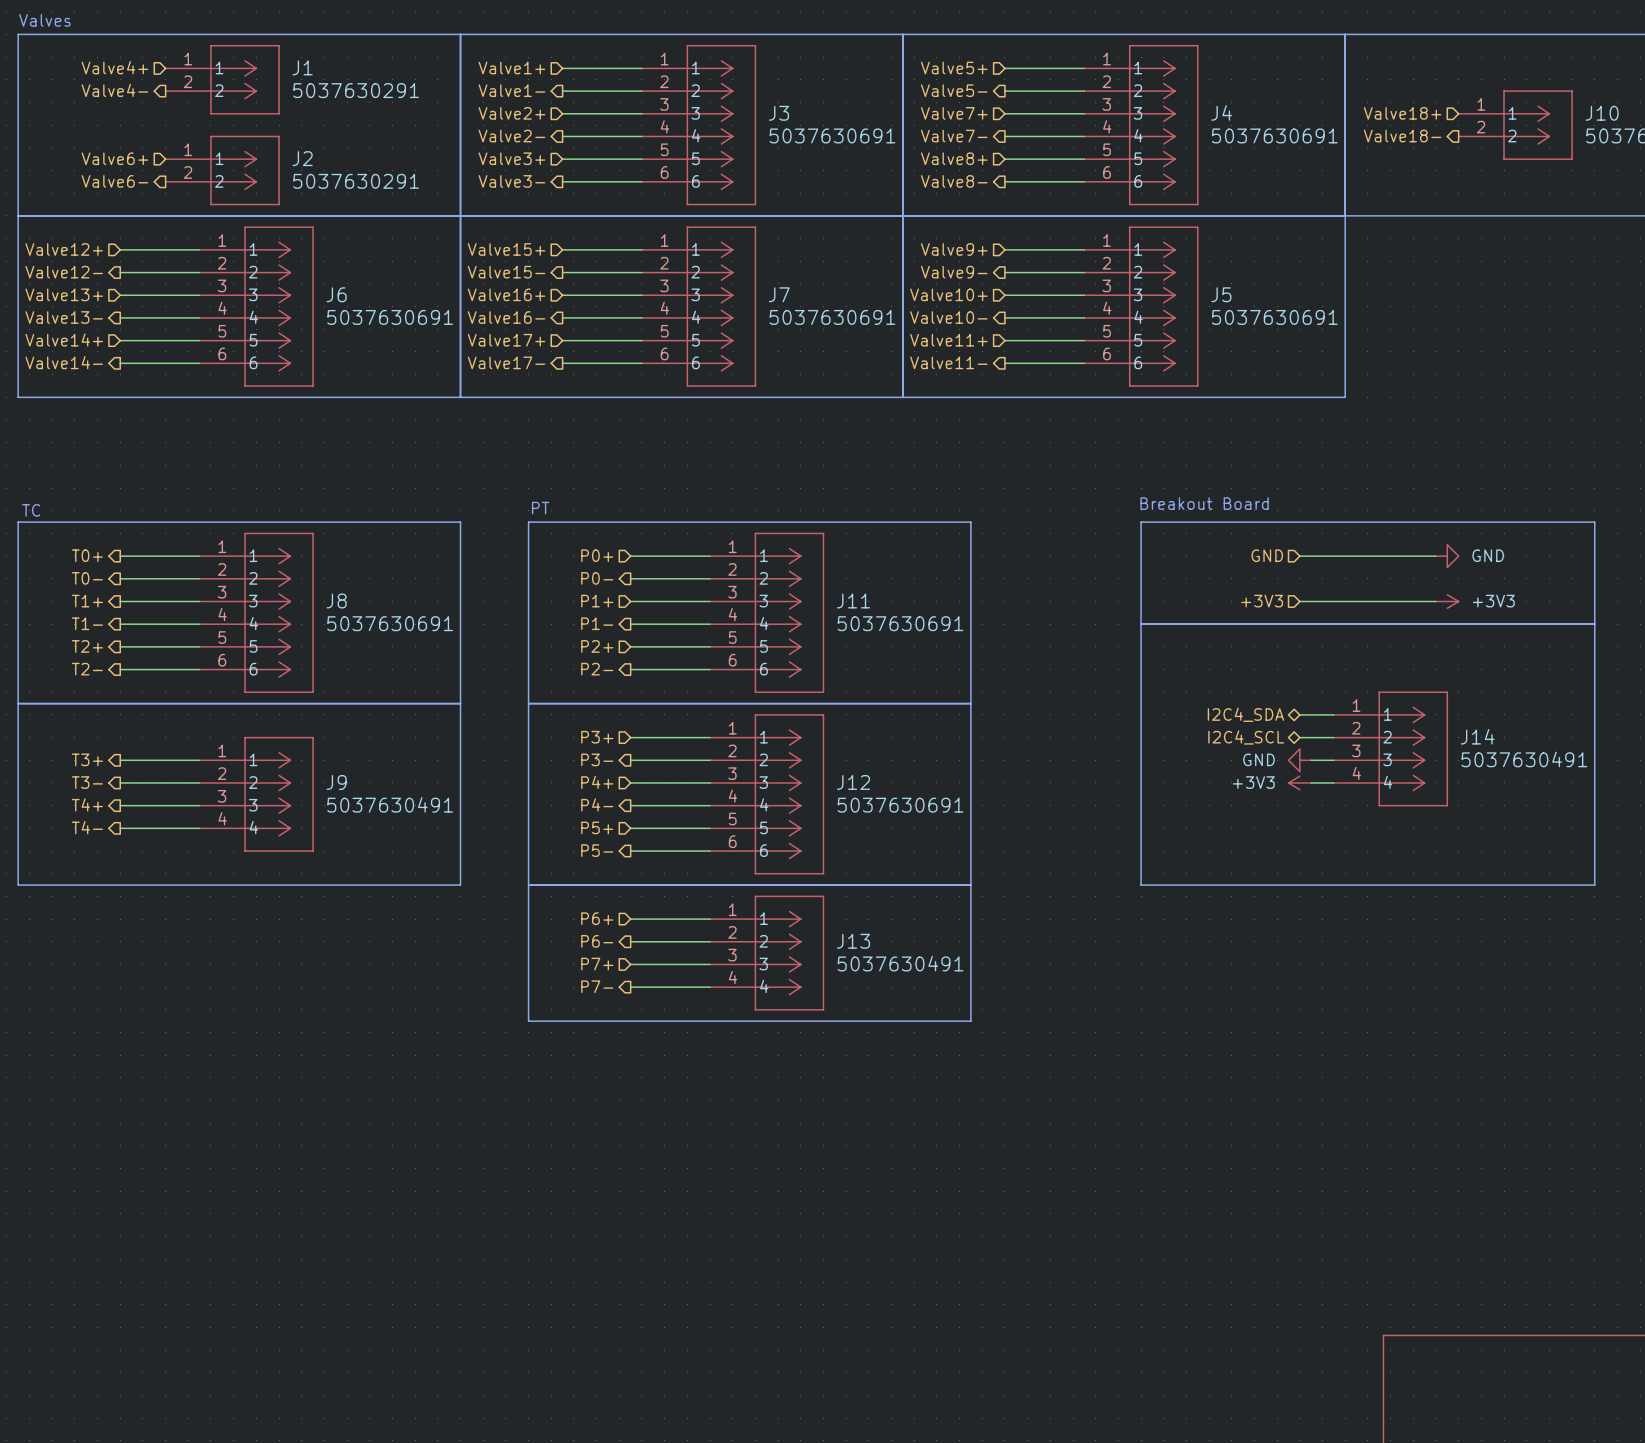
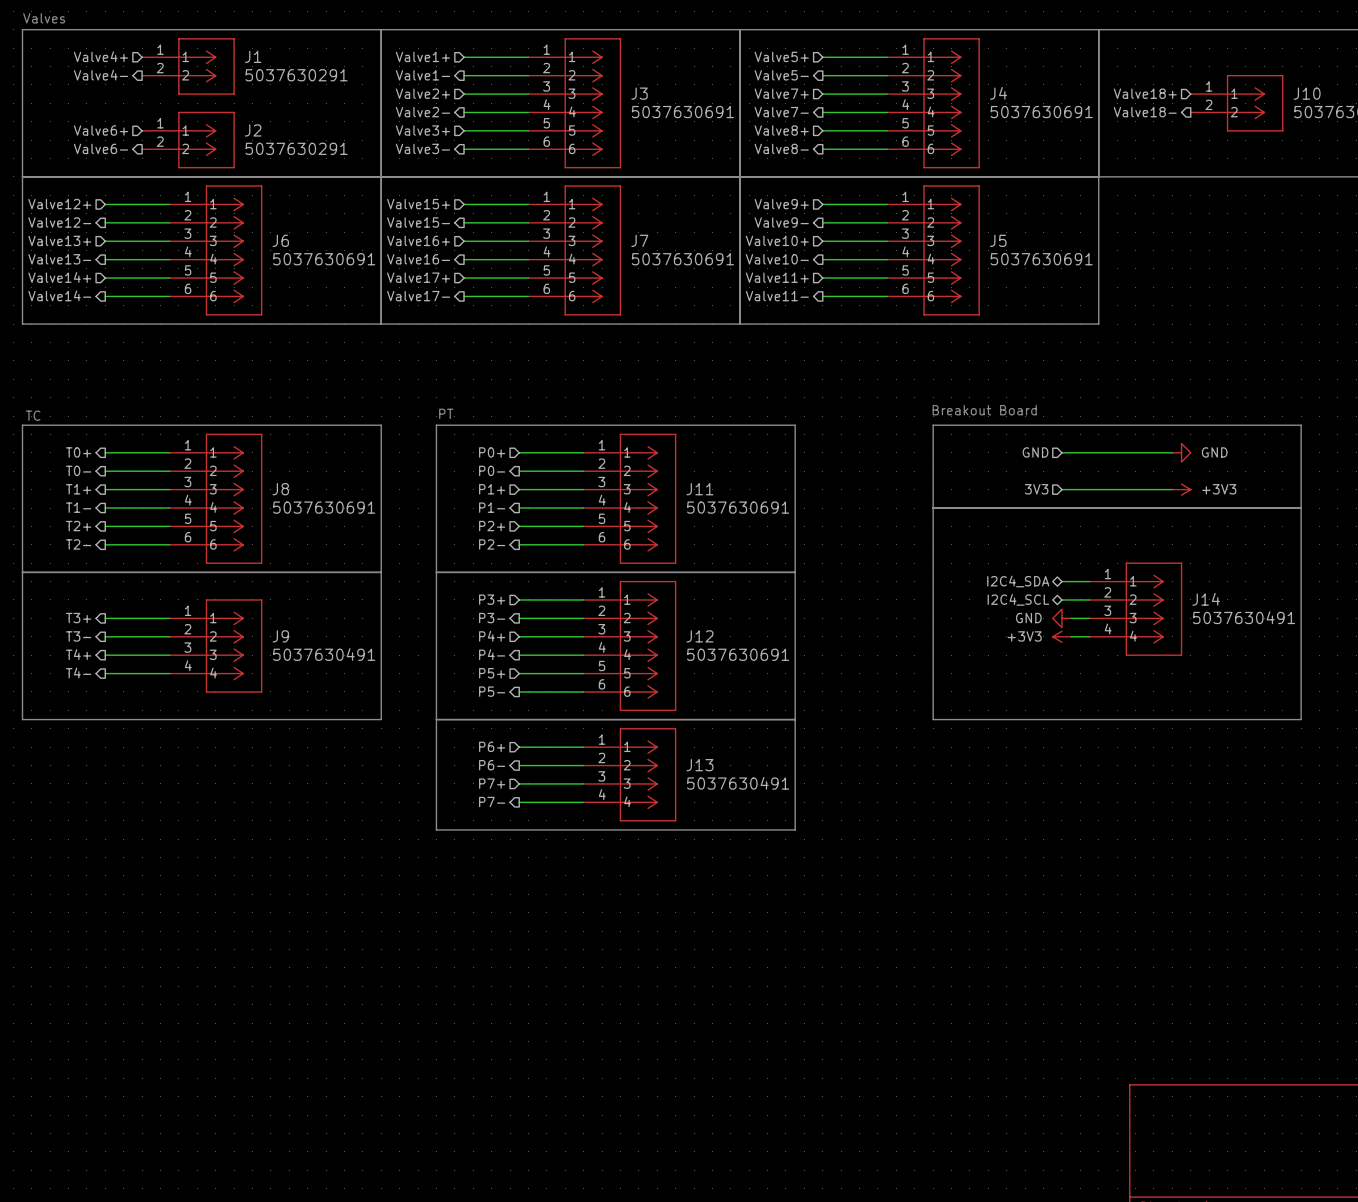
hierarchical label: +3V3 (1262, 601) -> 3V3 (1036, 489)

